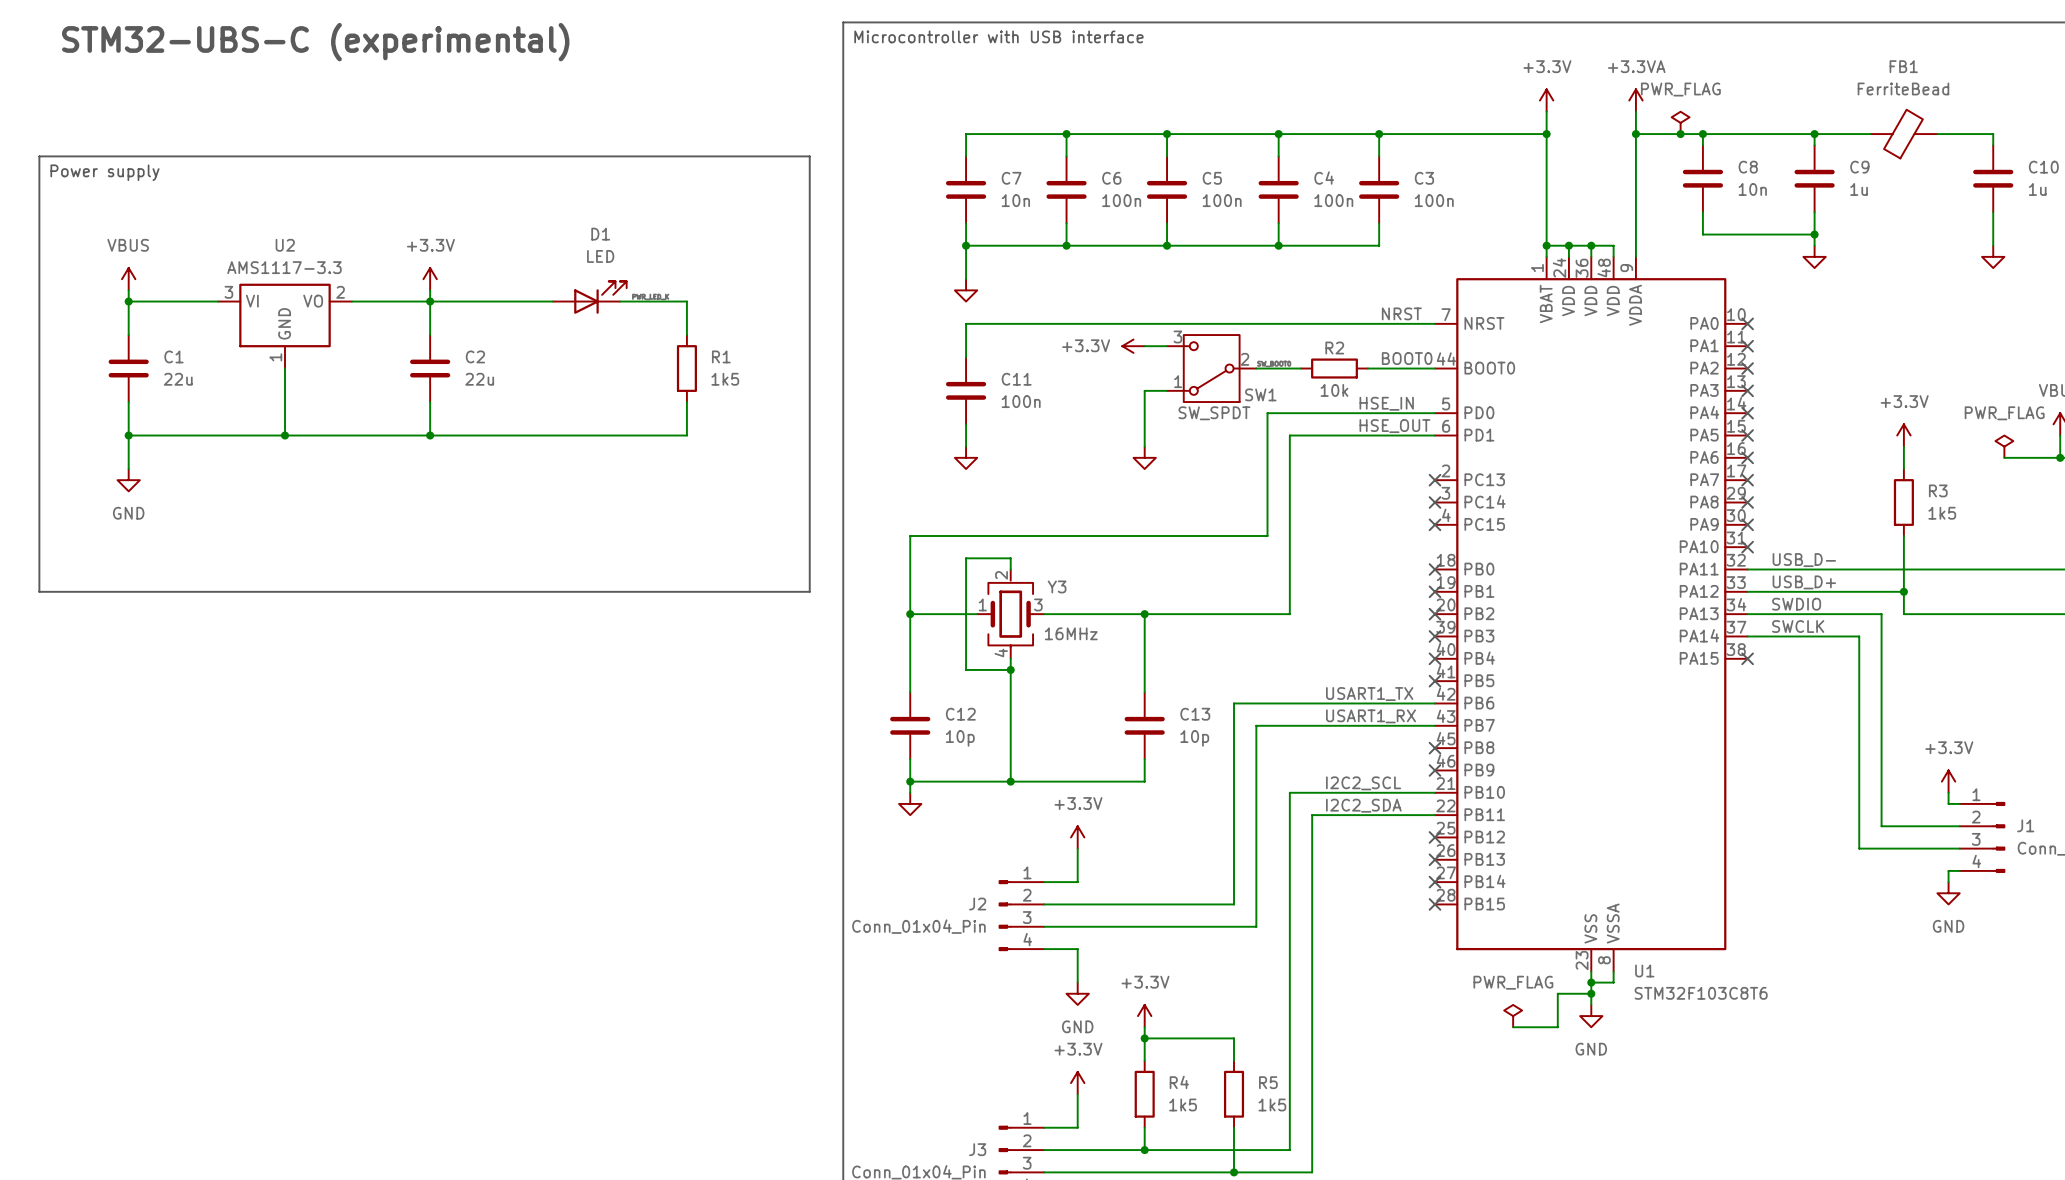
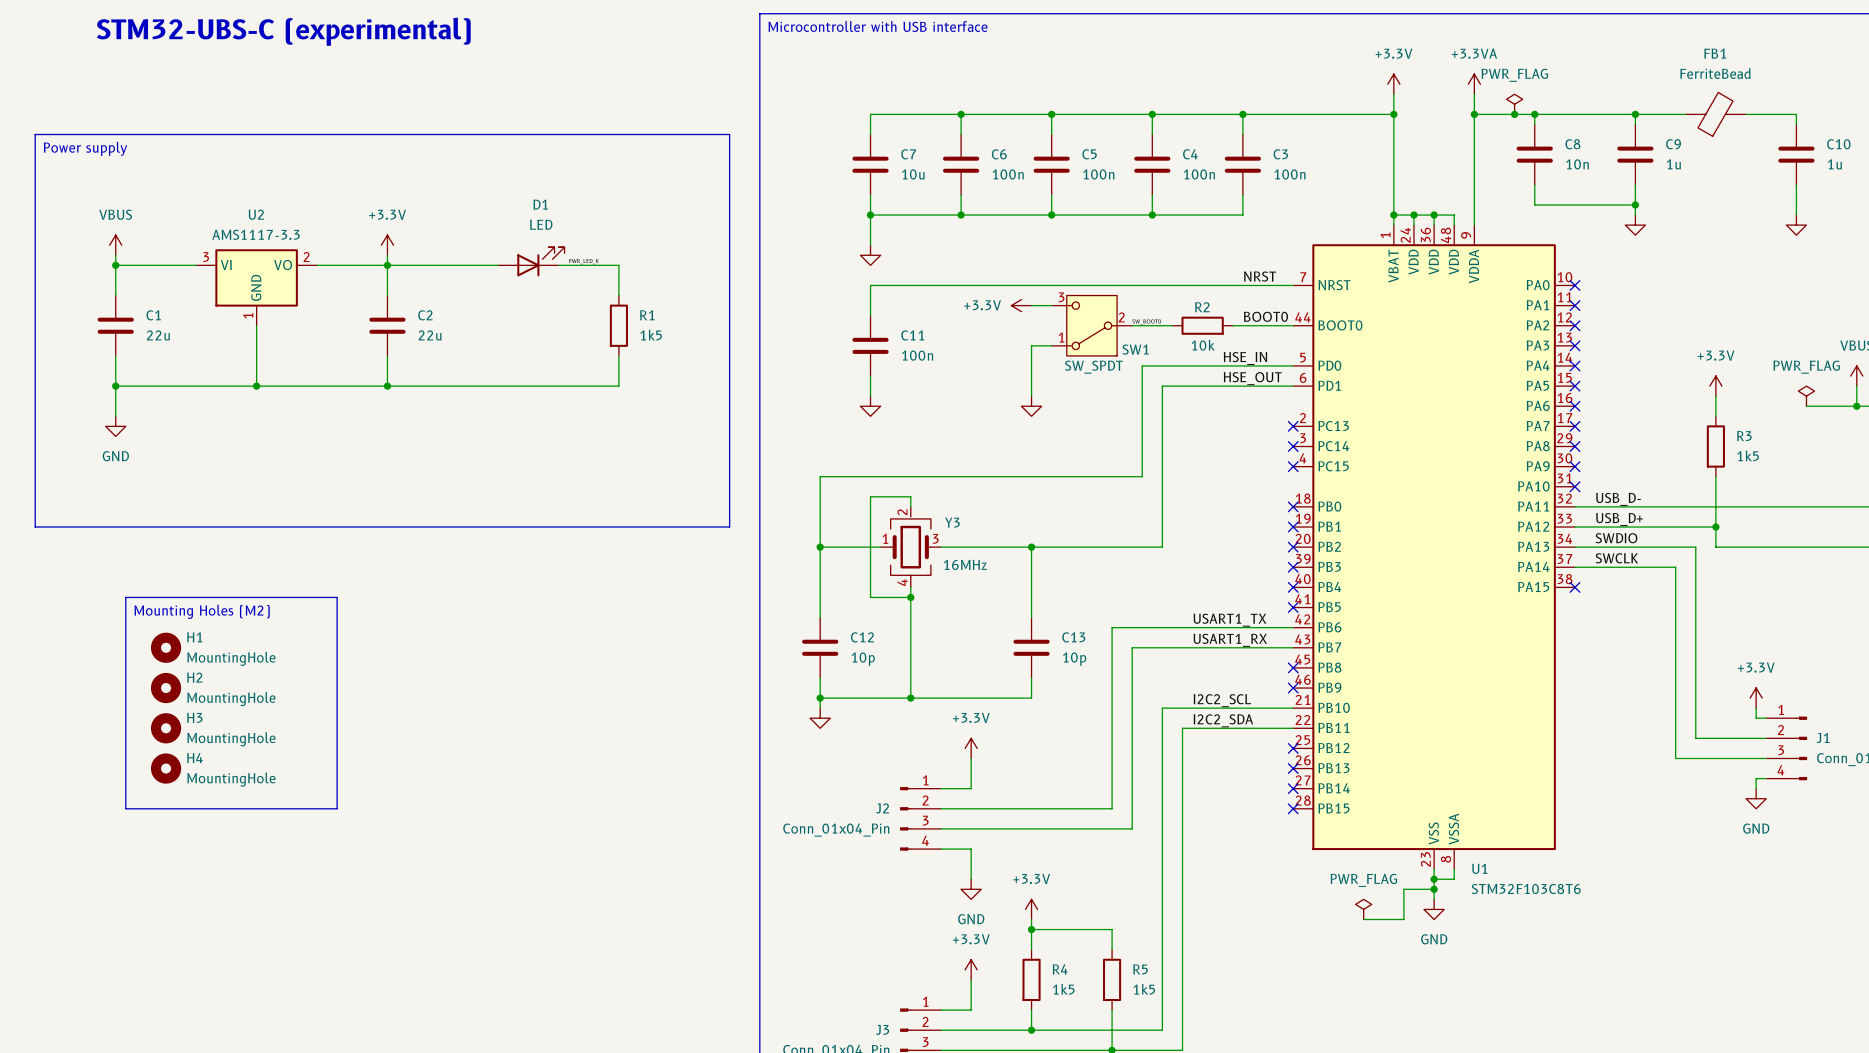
C7 value: 10n (1015, 200) -> 10u (913, 174)
line: none -> (125, 597) (337, 597) (337, 808) (125, 808) (125, 597)
text: none -> Mounting Holes (M2) (202, 611)
H1: none -> MountingHole (166, 647)
H2: none -> MountingHole (166, 688)
H3: none -> MountingHole (166, 728)
H4: none -> MountingHole (166, 768)

